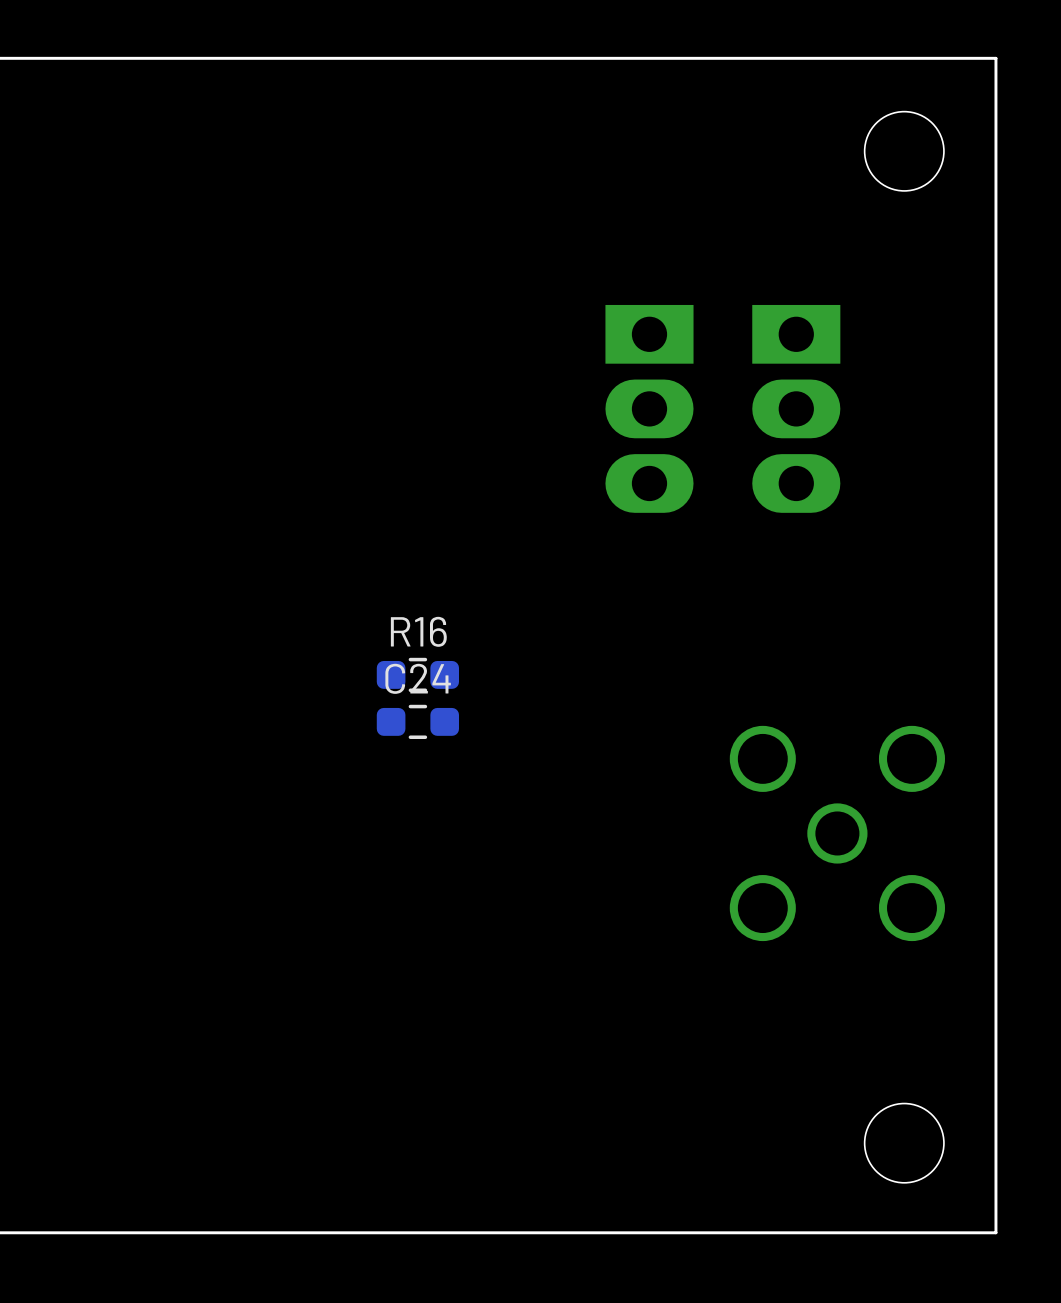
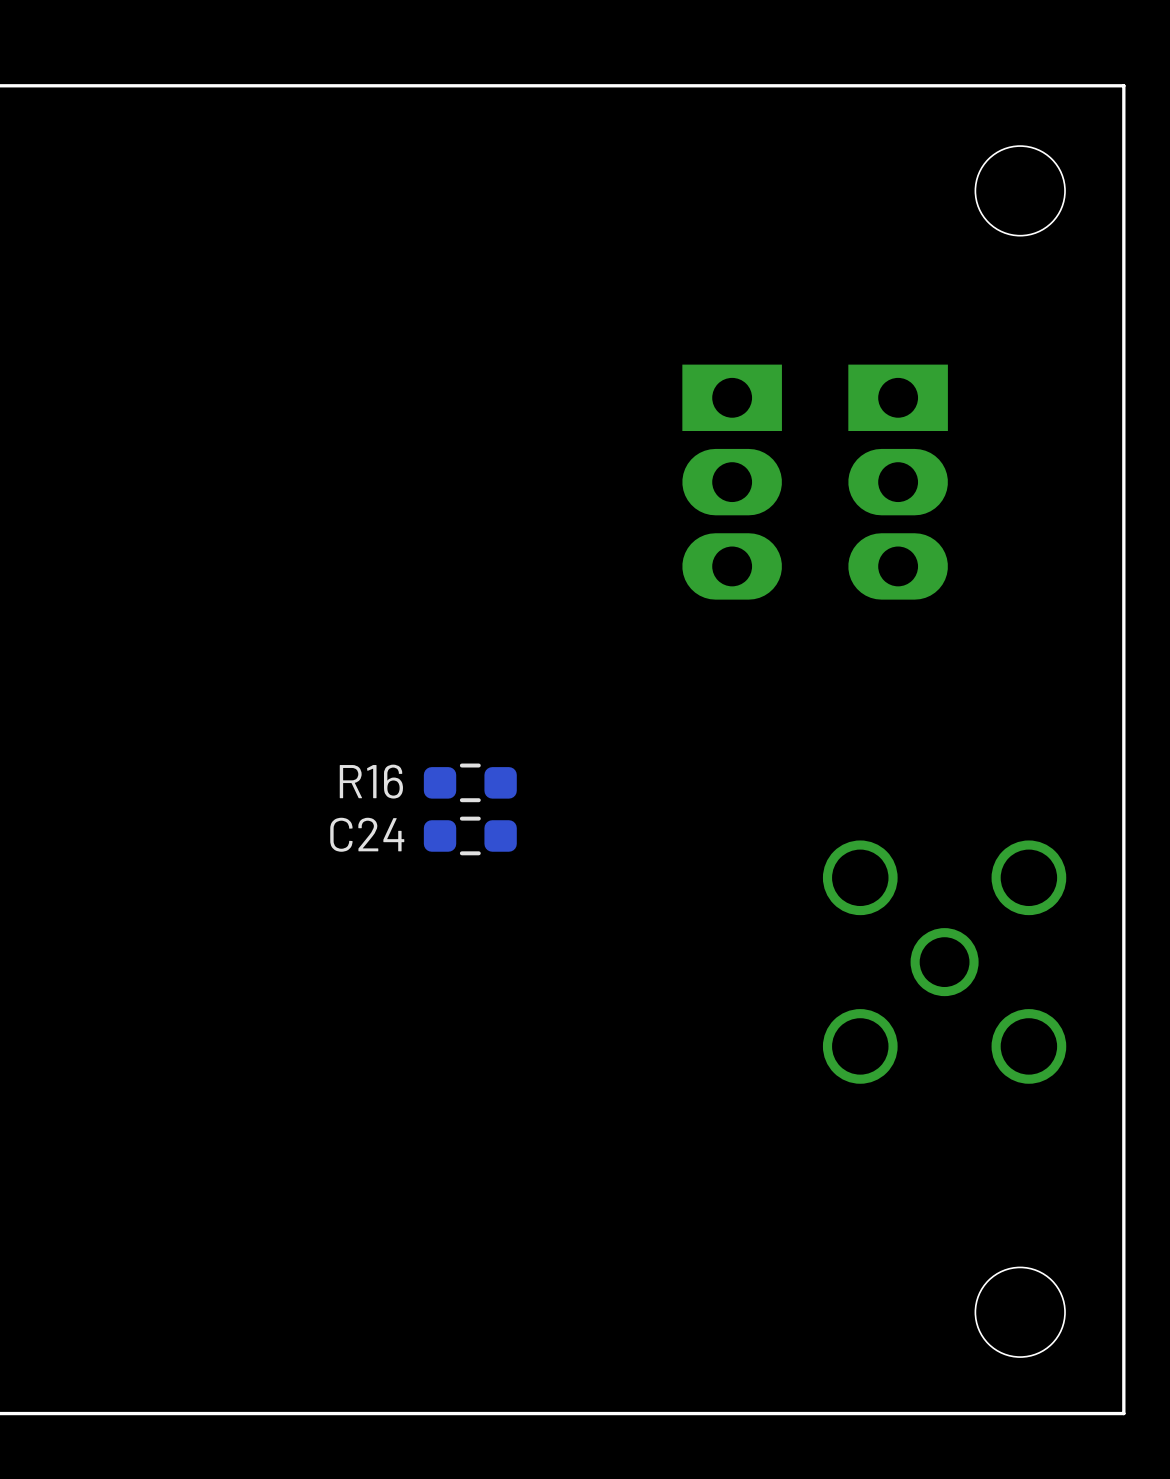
R16 name position: R16 (418, 631) -> R16 (371, 781)
C24 name position: C24 (418, 678) -> C24 (367, 834)

